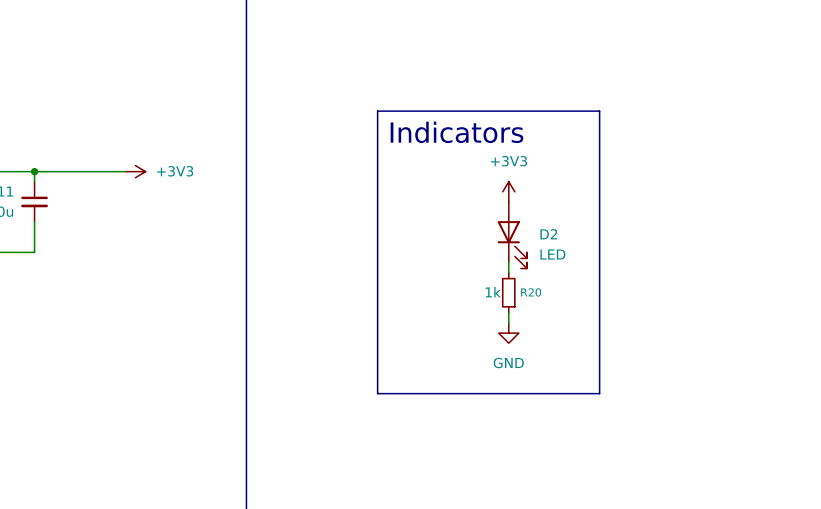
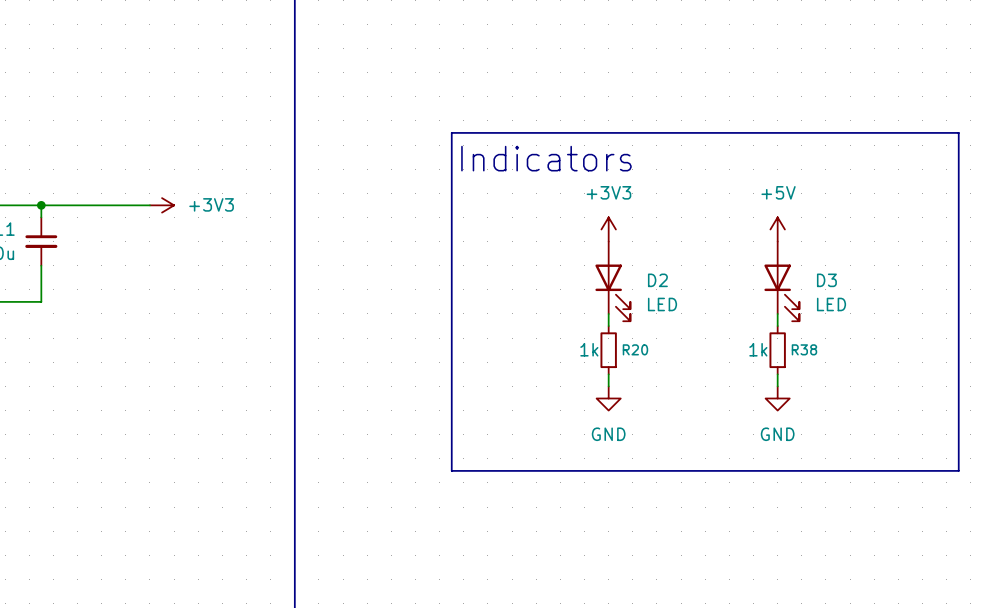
line: (599, 111) (599, 393) -> (717, 132) (958, 132) (958, 470) (717, 470)
power symbol: none -> +5V (777, 229)
D3: none -> LED (781, 281)
wire: none -> (777, 313) (777, 326)
R38: none -> 1k (777, 350)
wire: none -> (777, 374) (777, 386)
power symbol: none -> GND (777, 398)

